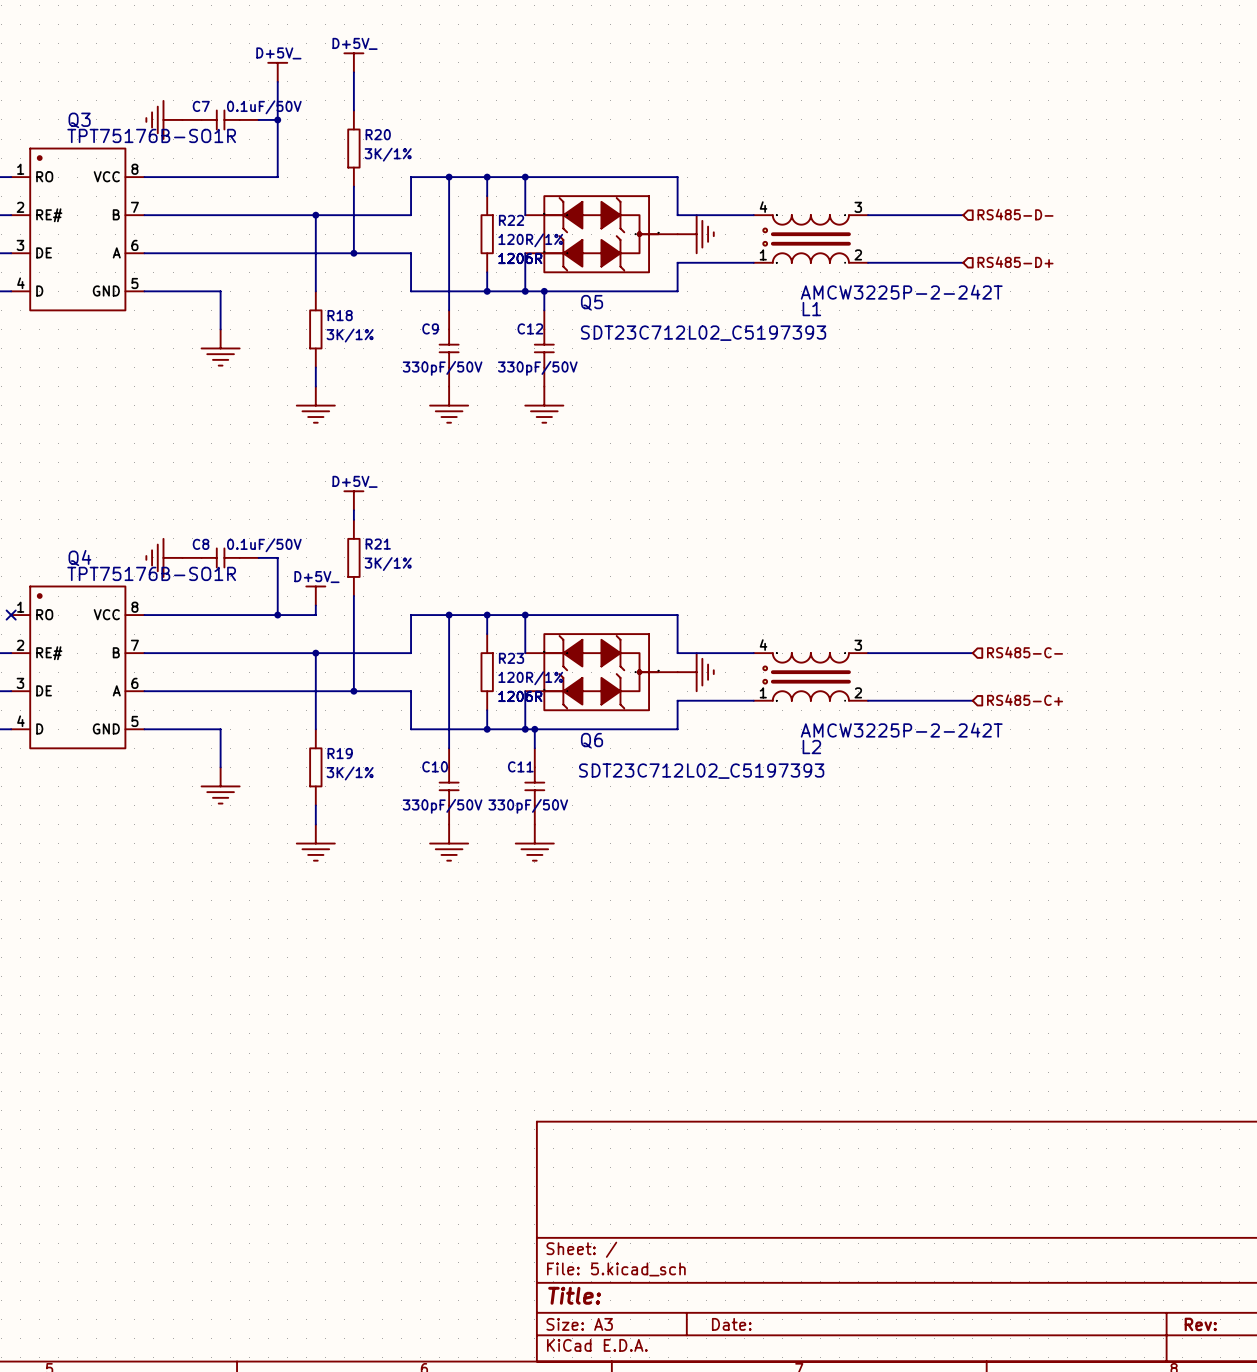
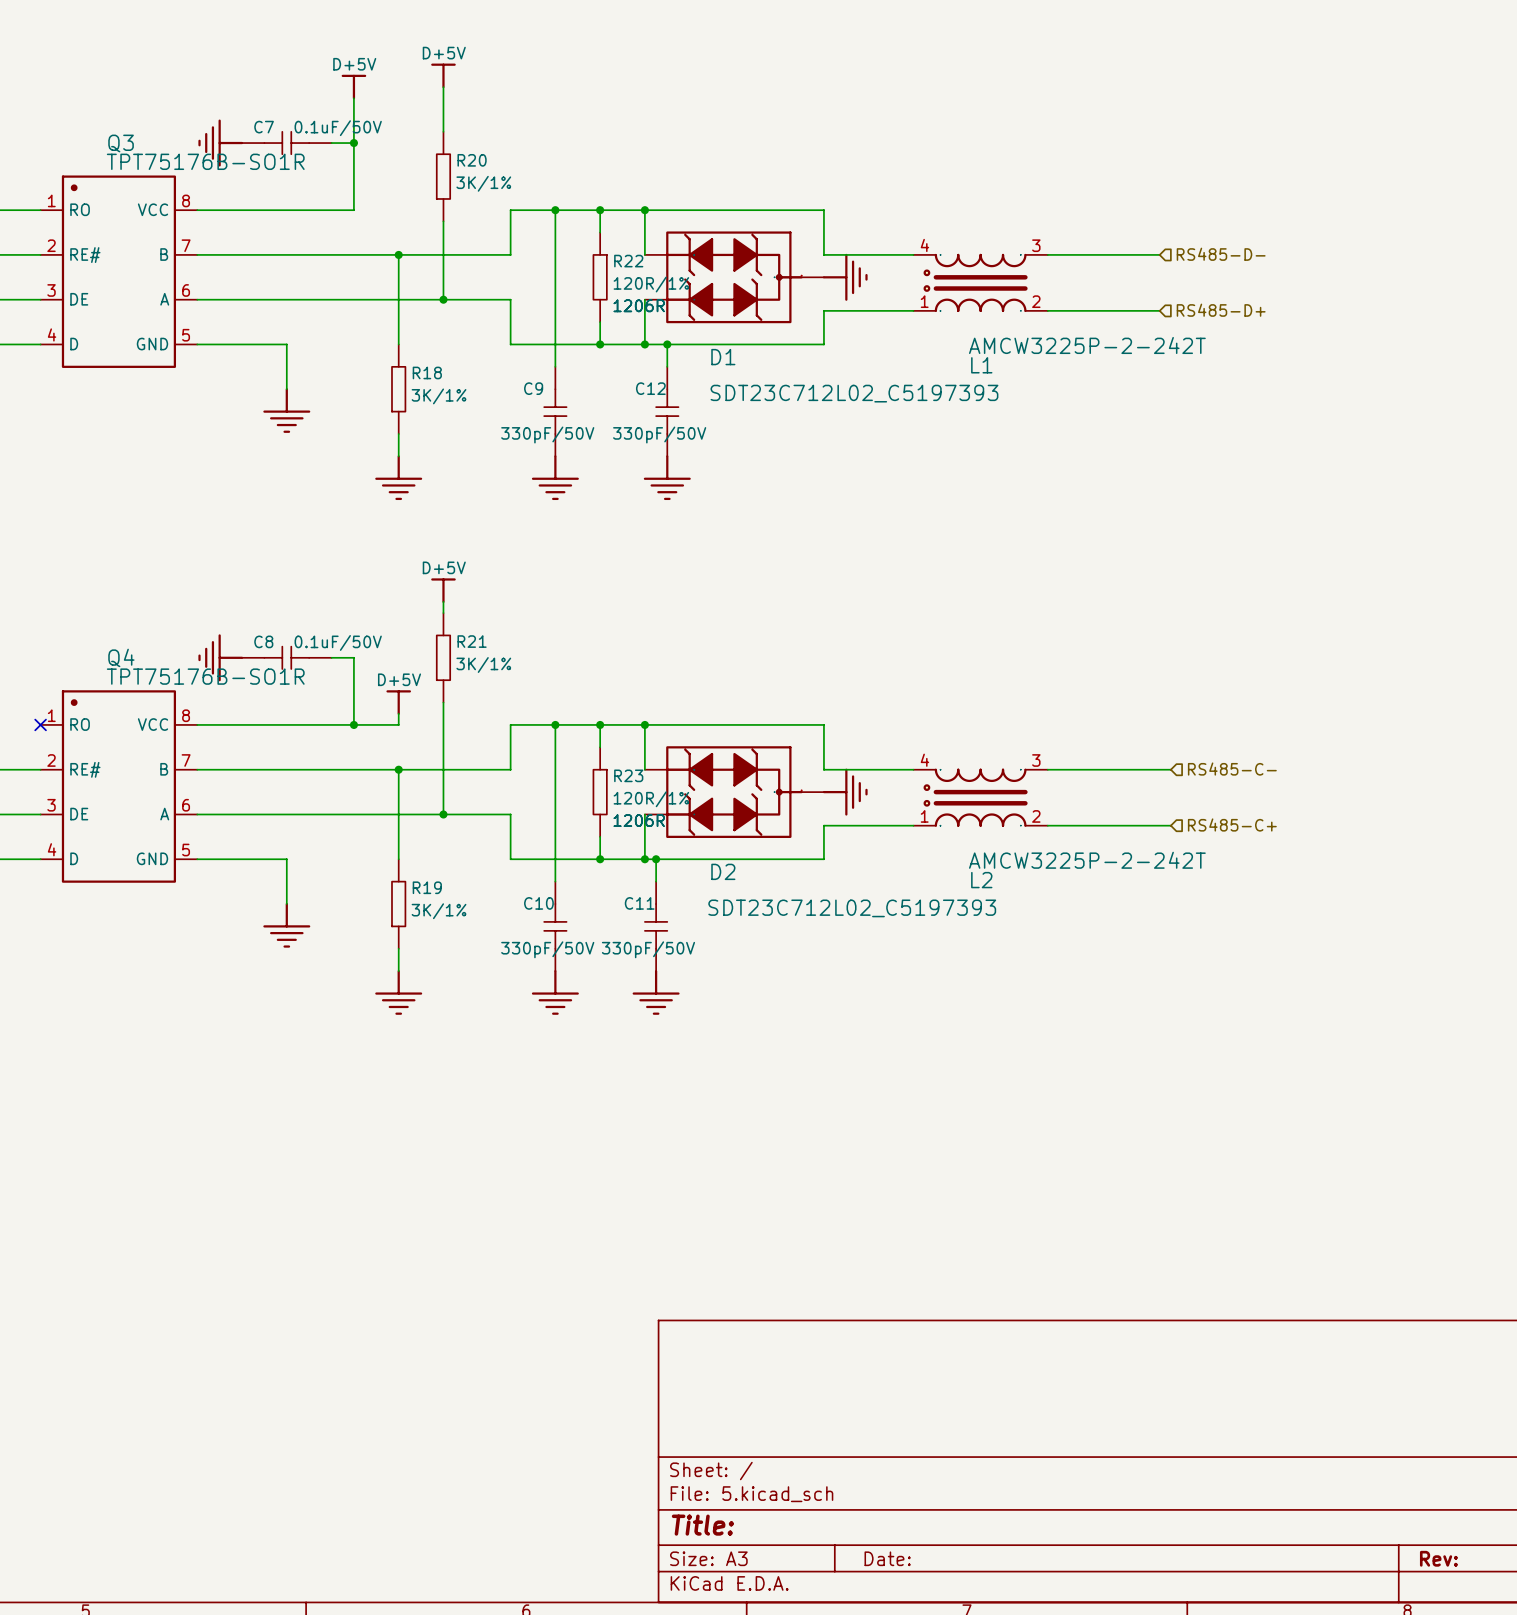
power symbol: D+5V_ (353, 62) -> D+5V (443, 75)
power symbol: D+5V_ (277, 72) -> D+5V (353, 87)
Q5 name: Q5 (592, 302) -> D1 (723, 357)
power symbol: D+5V_ (353, 500) -> D+5V (443, 590)
power symbol: D+5V_ (315, 596) -> D+5V (398, 702)
Q6 name: Q6 (592, 740) -> D2 (723, 871)

